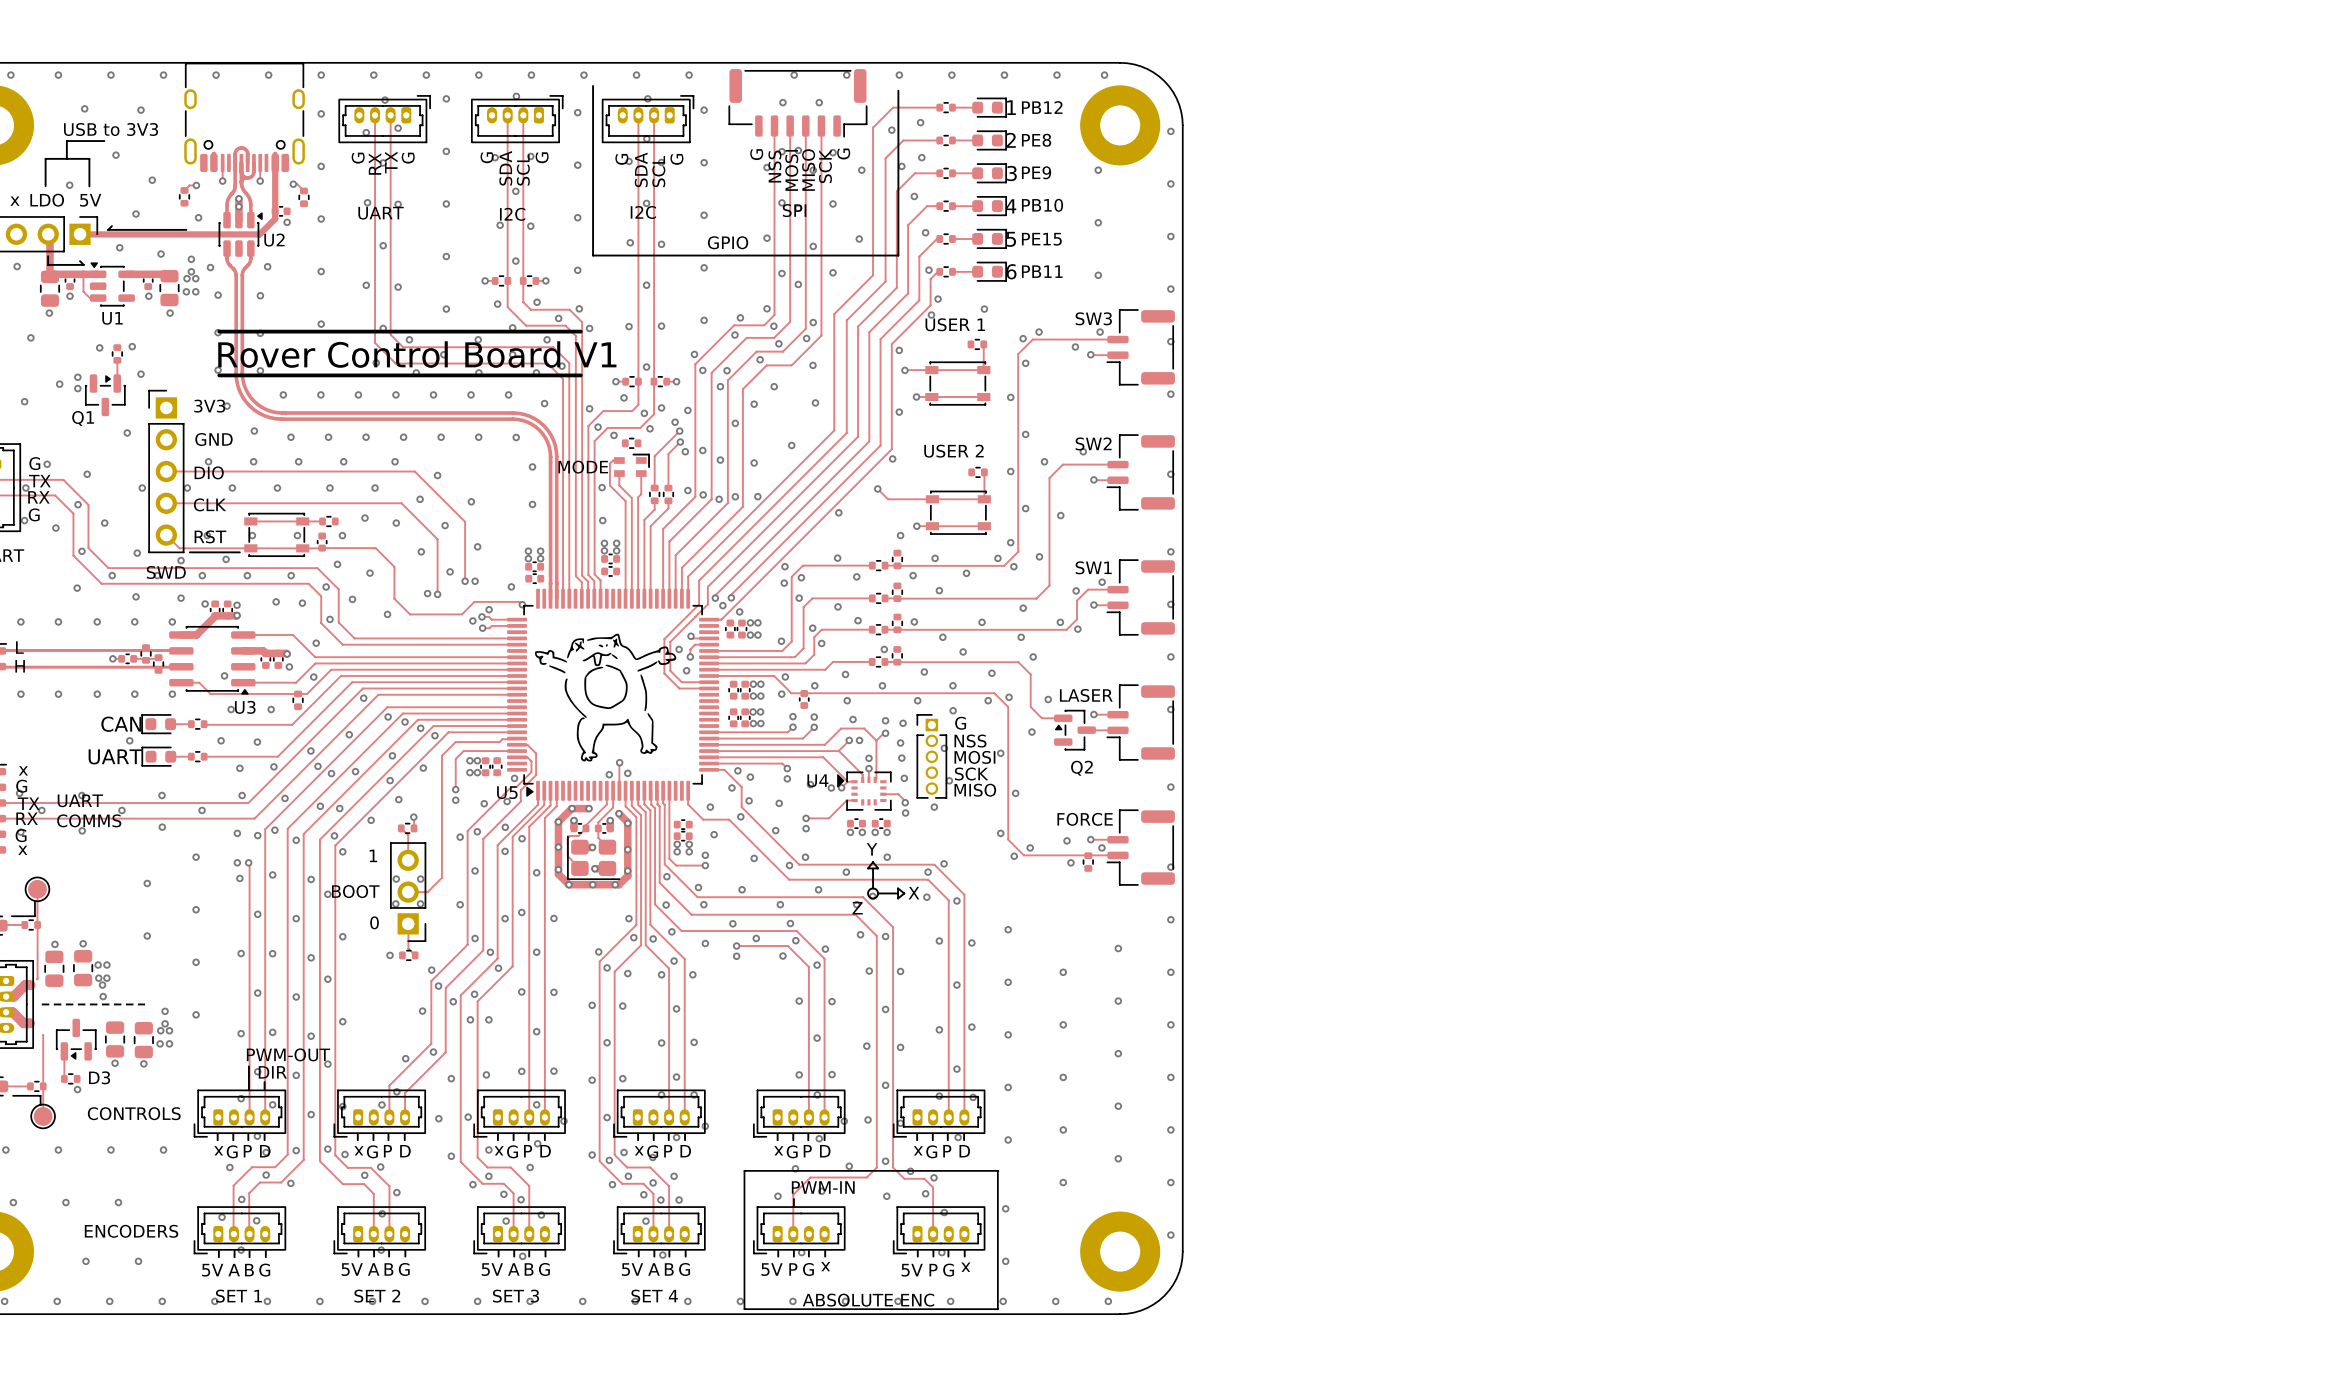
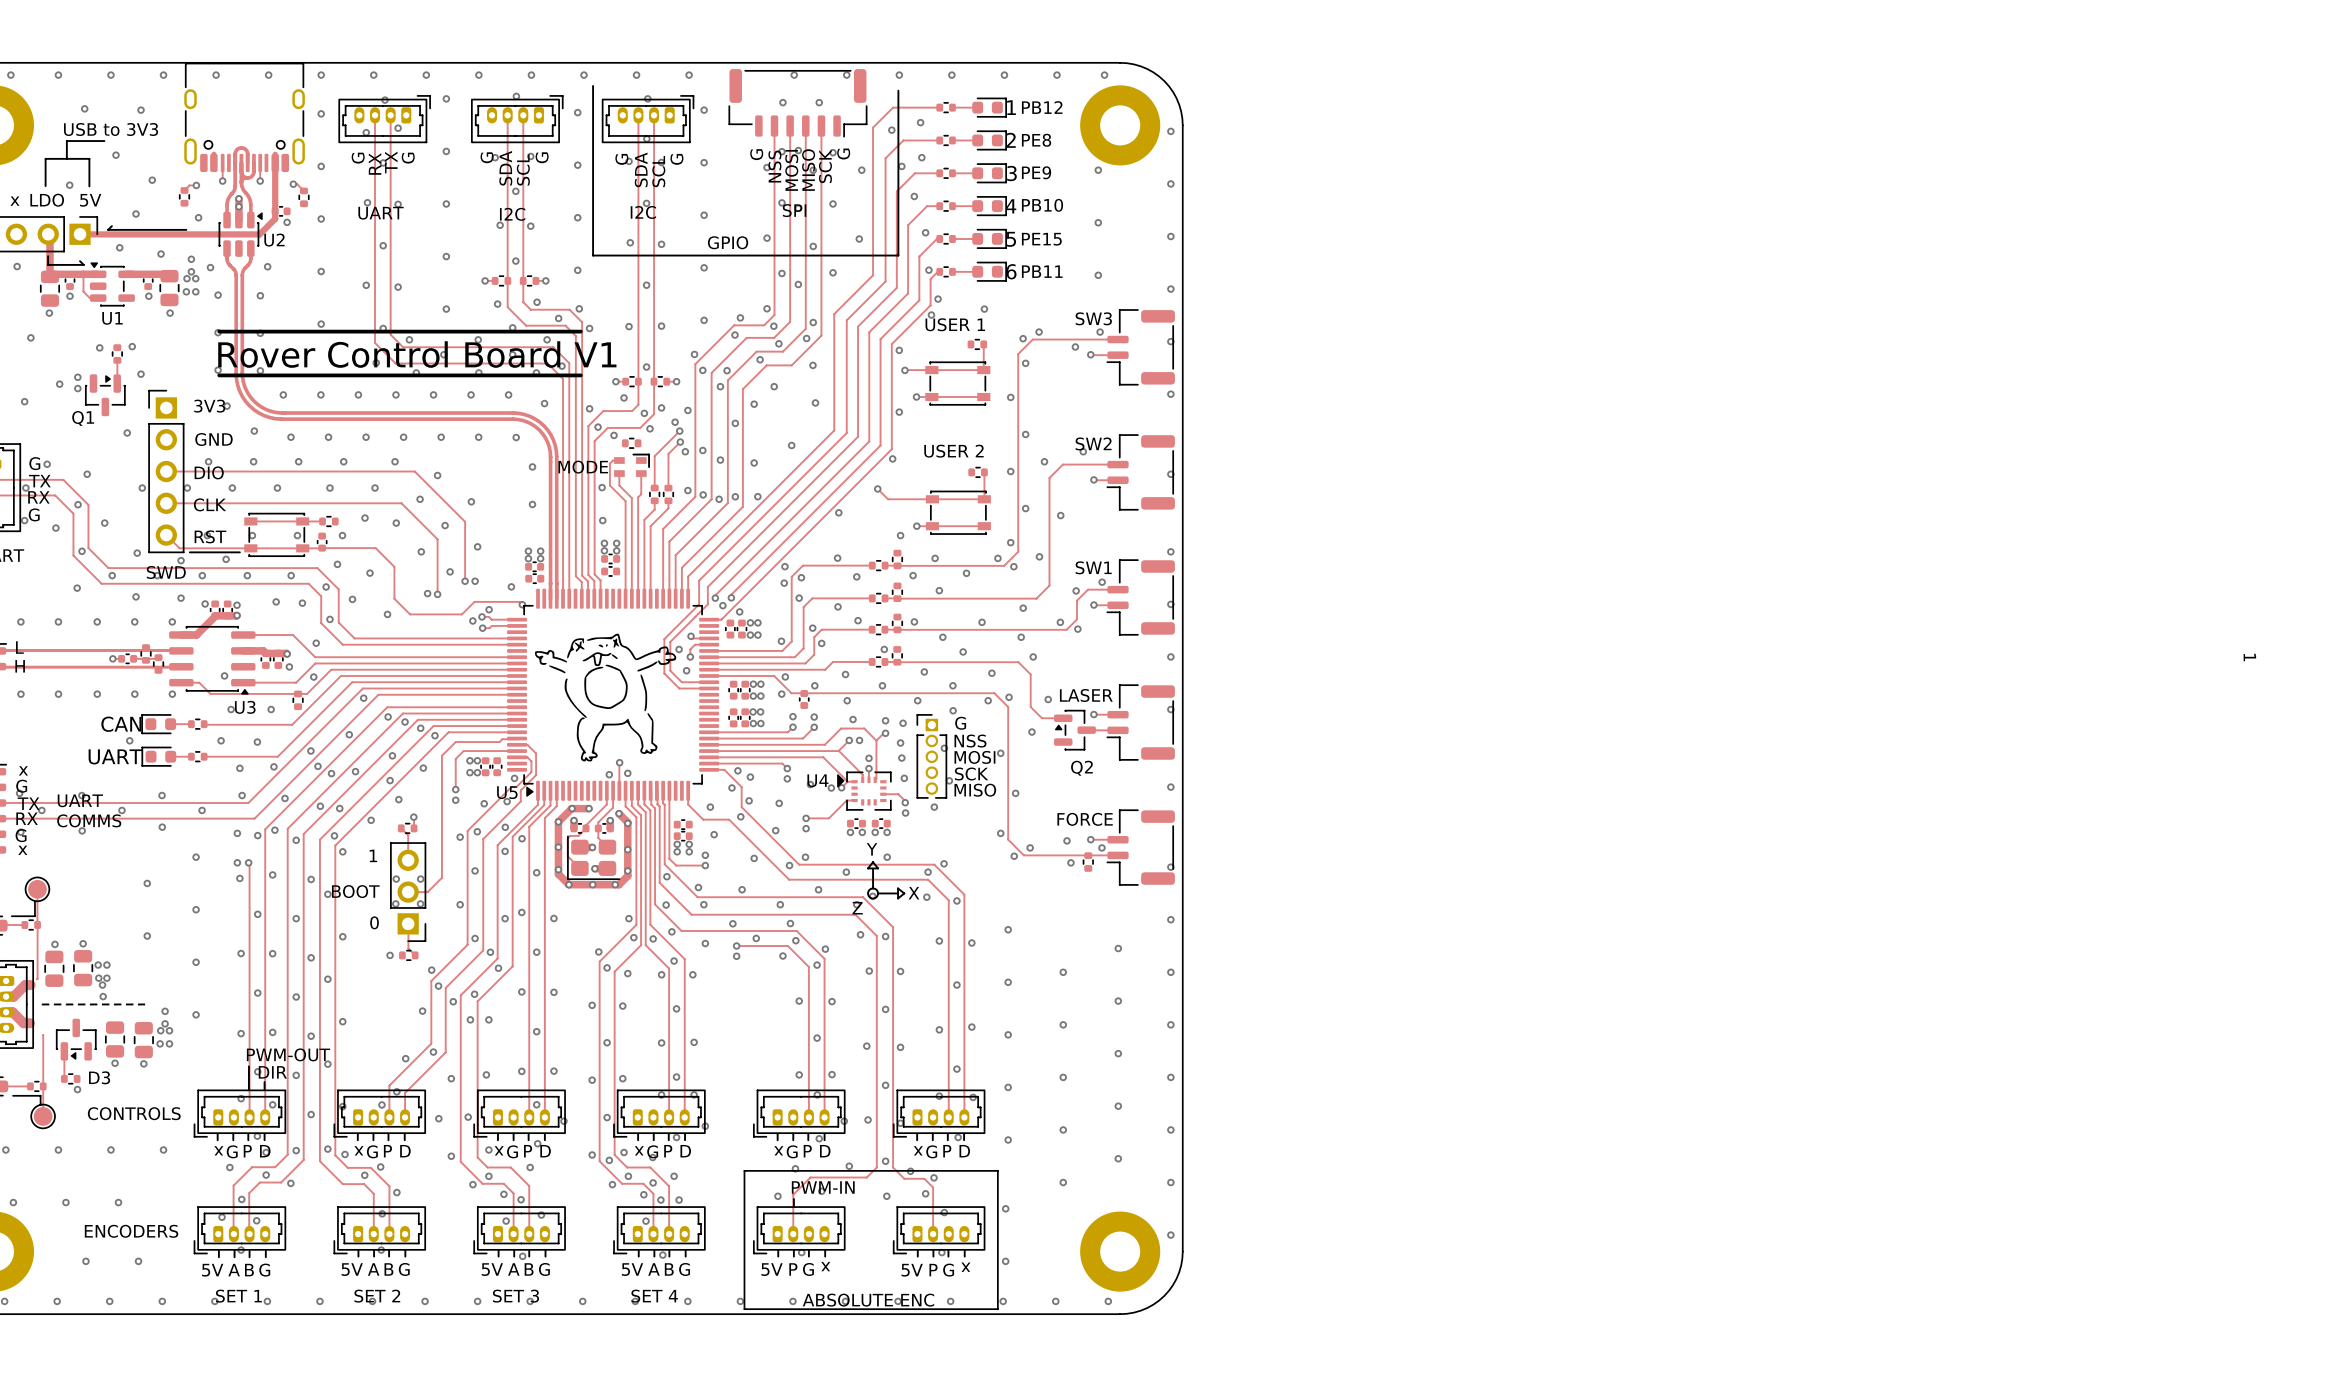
text: none -> 1 (2249, 657)

